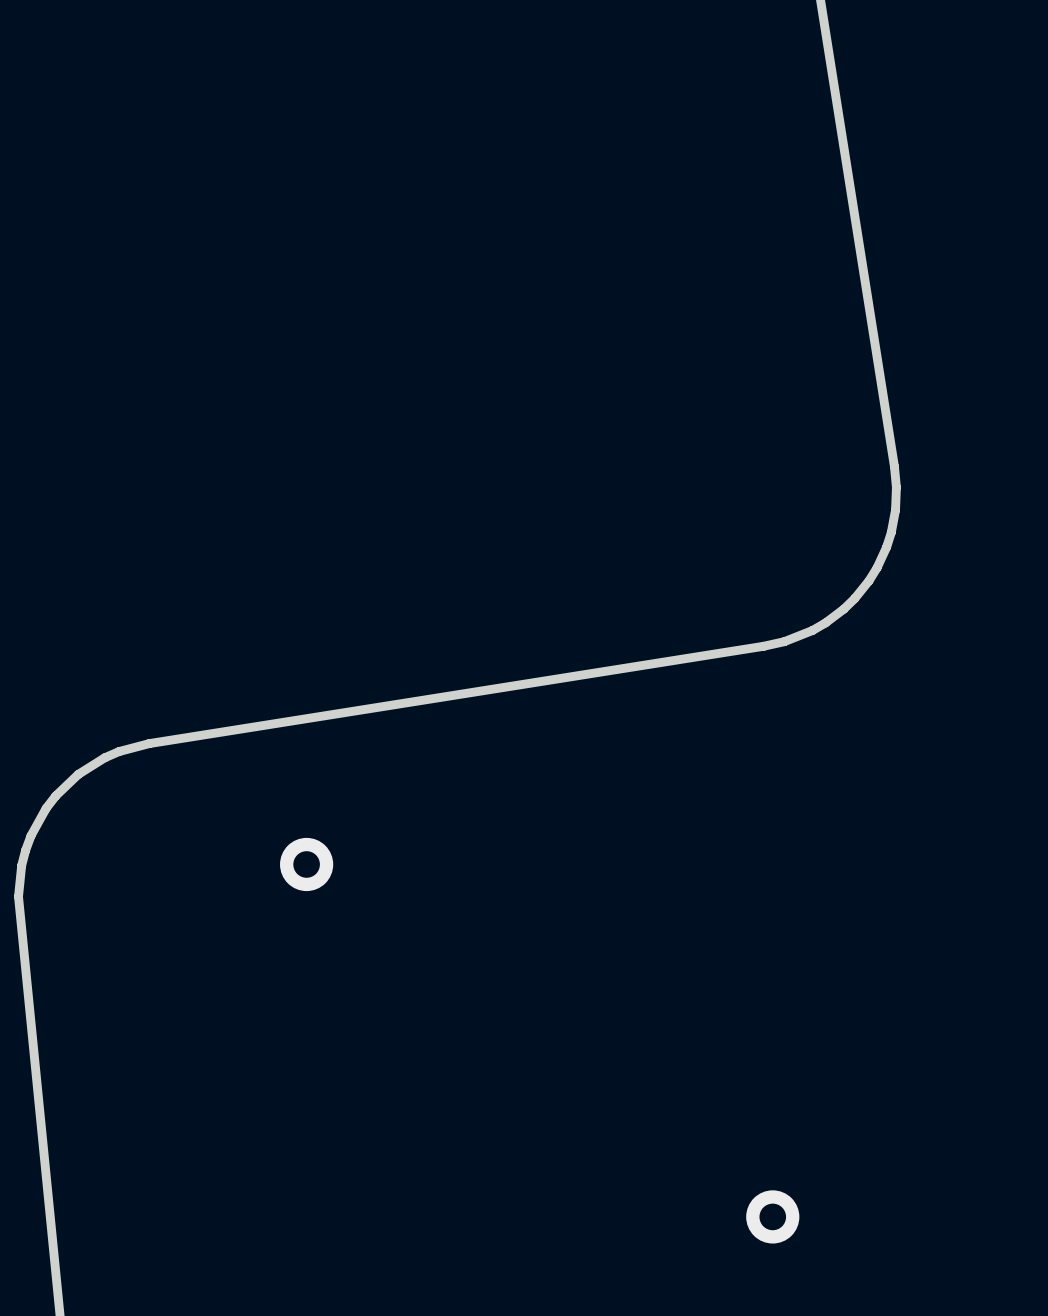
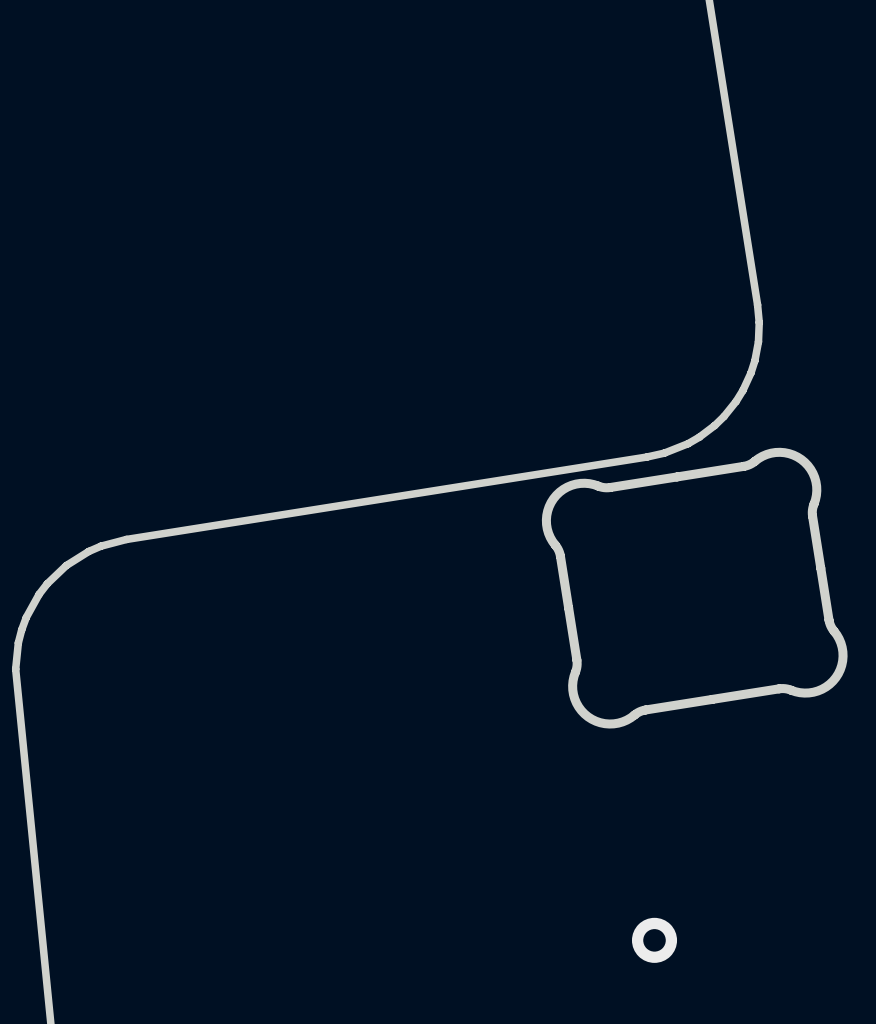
part: none -> (694, 588)
via: (306, 864) -> none

